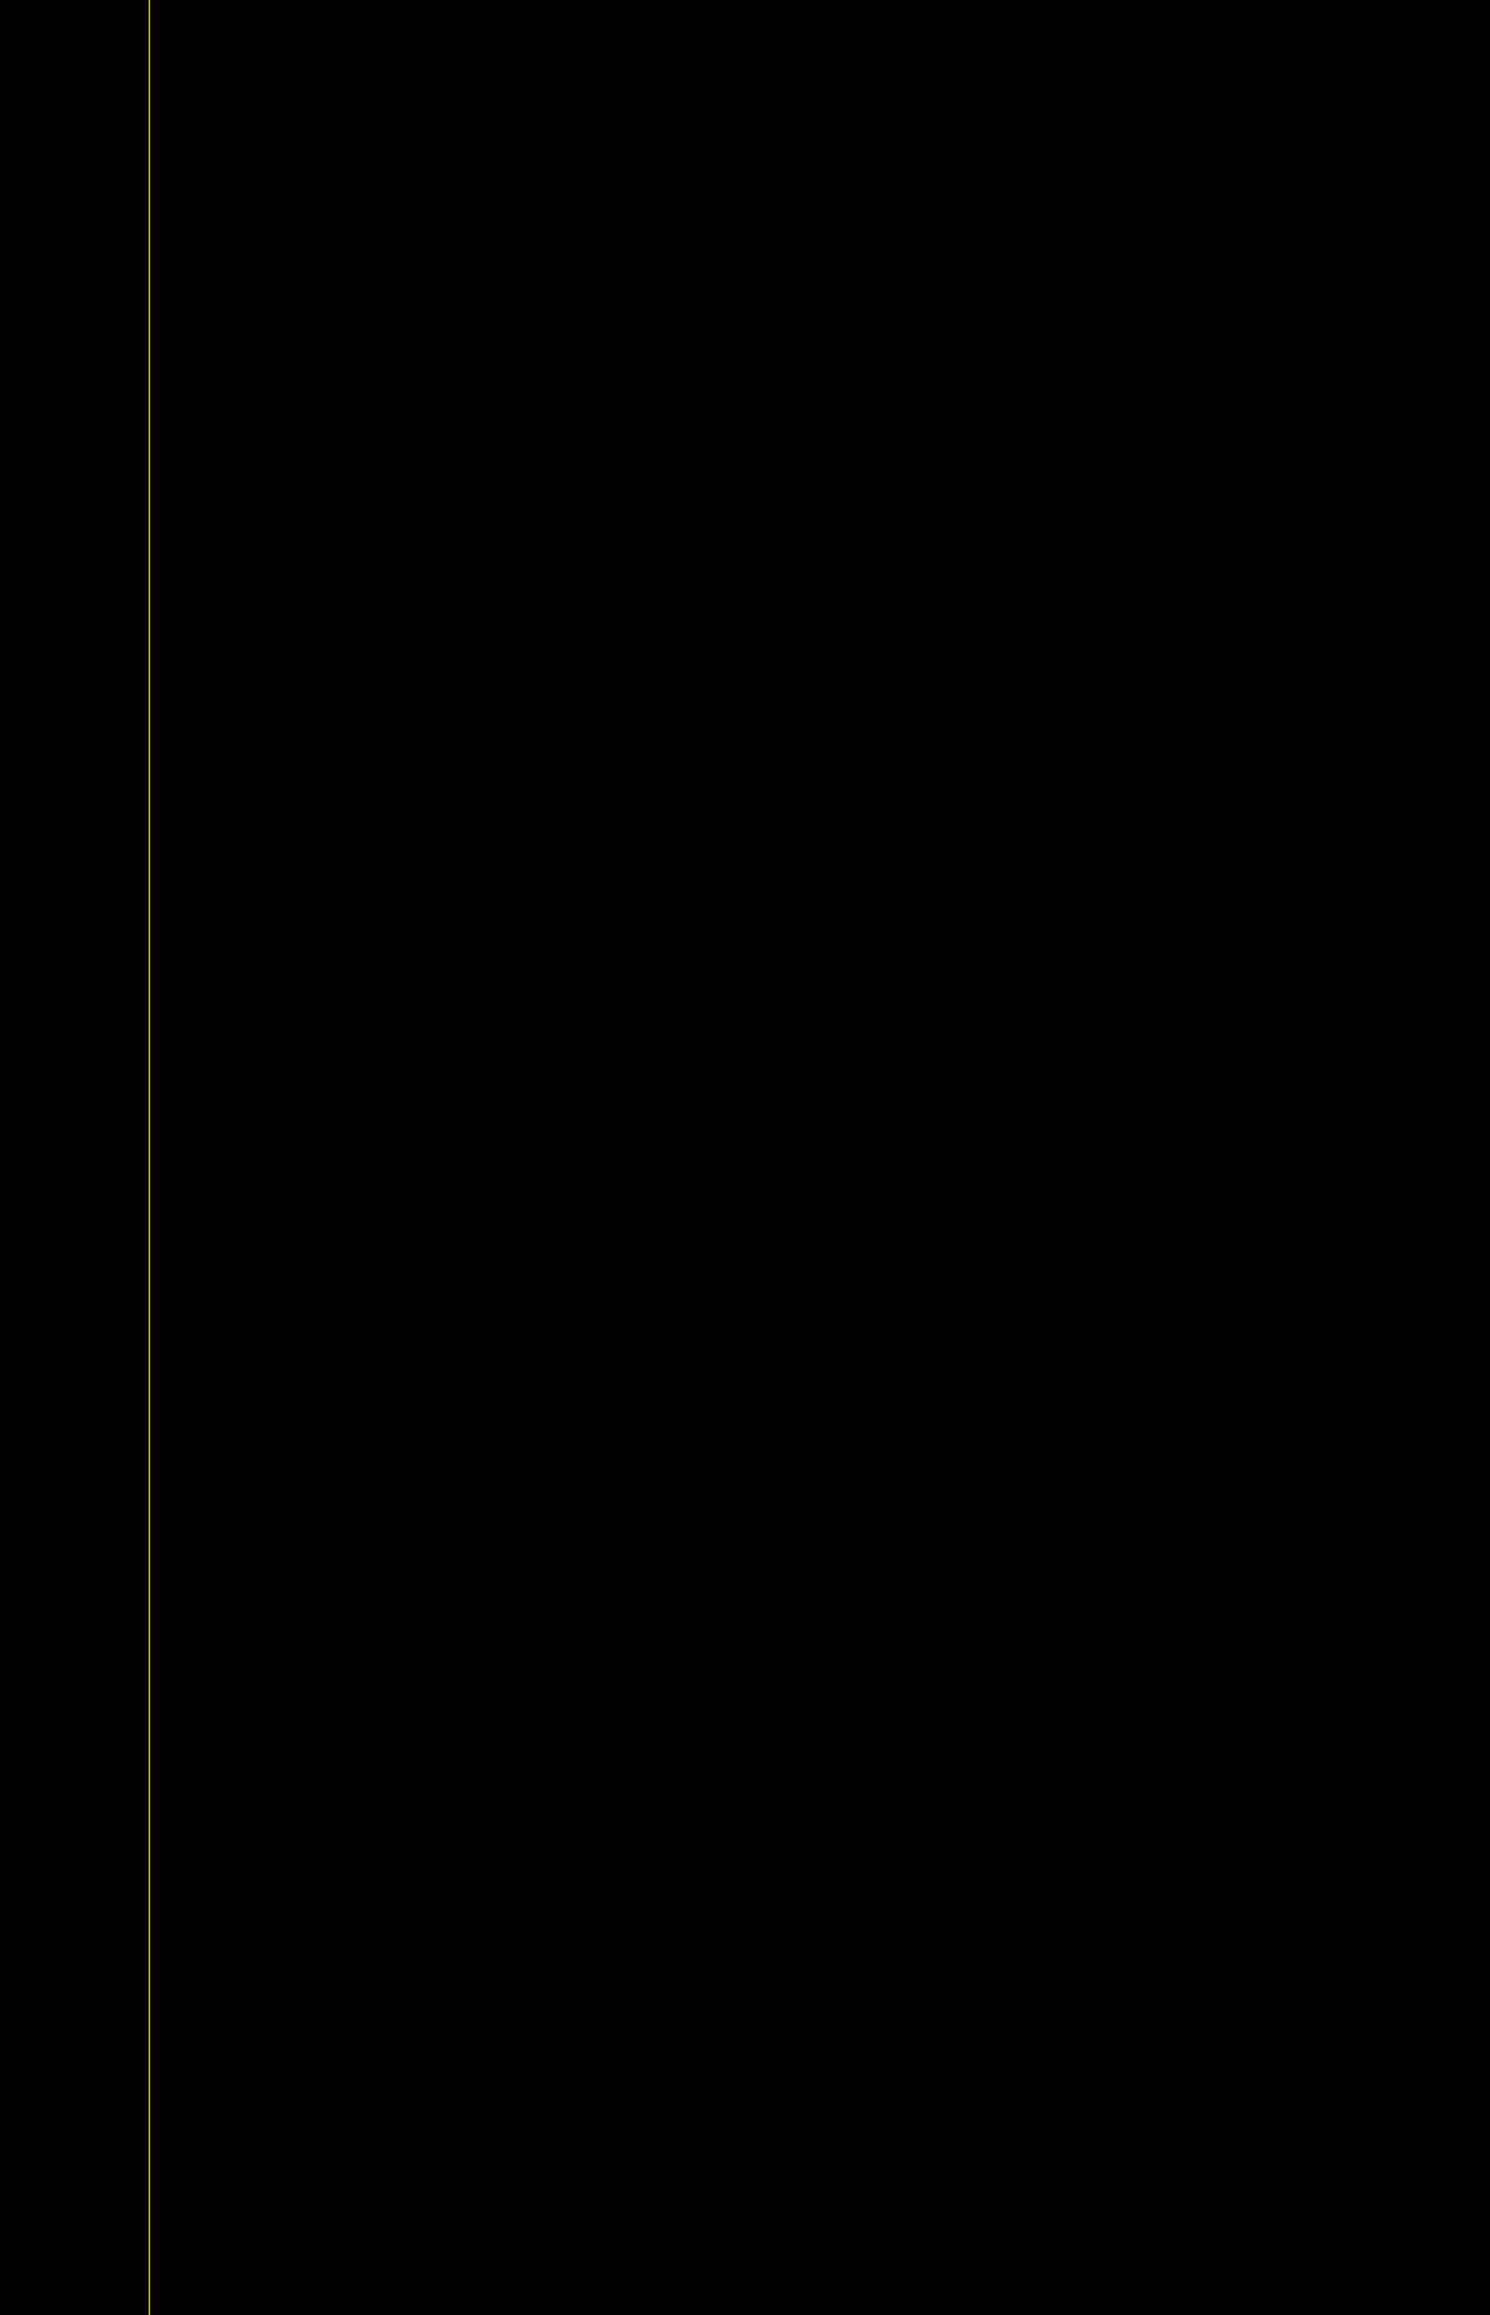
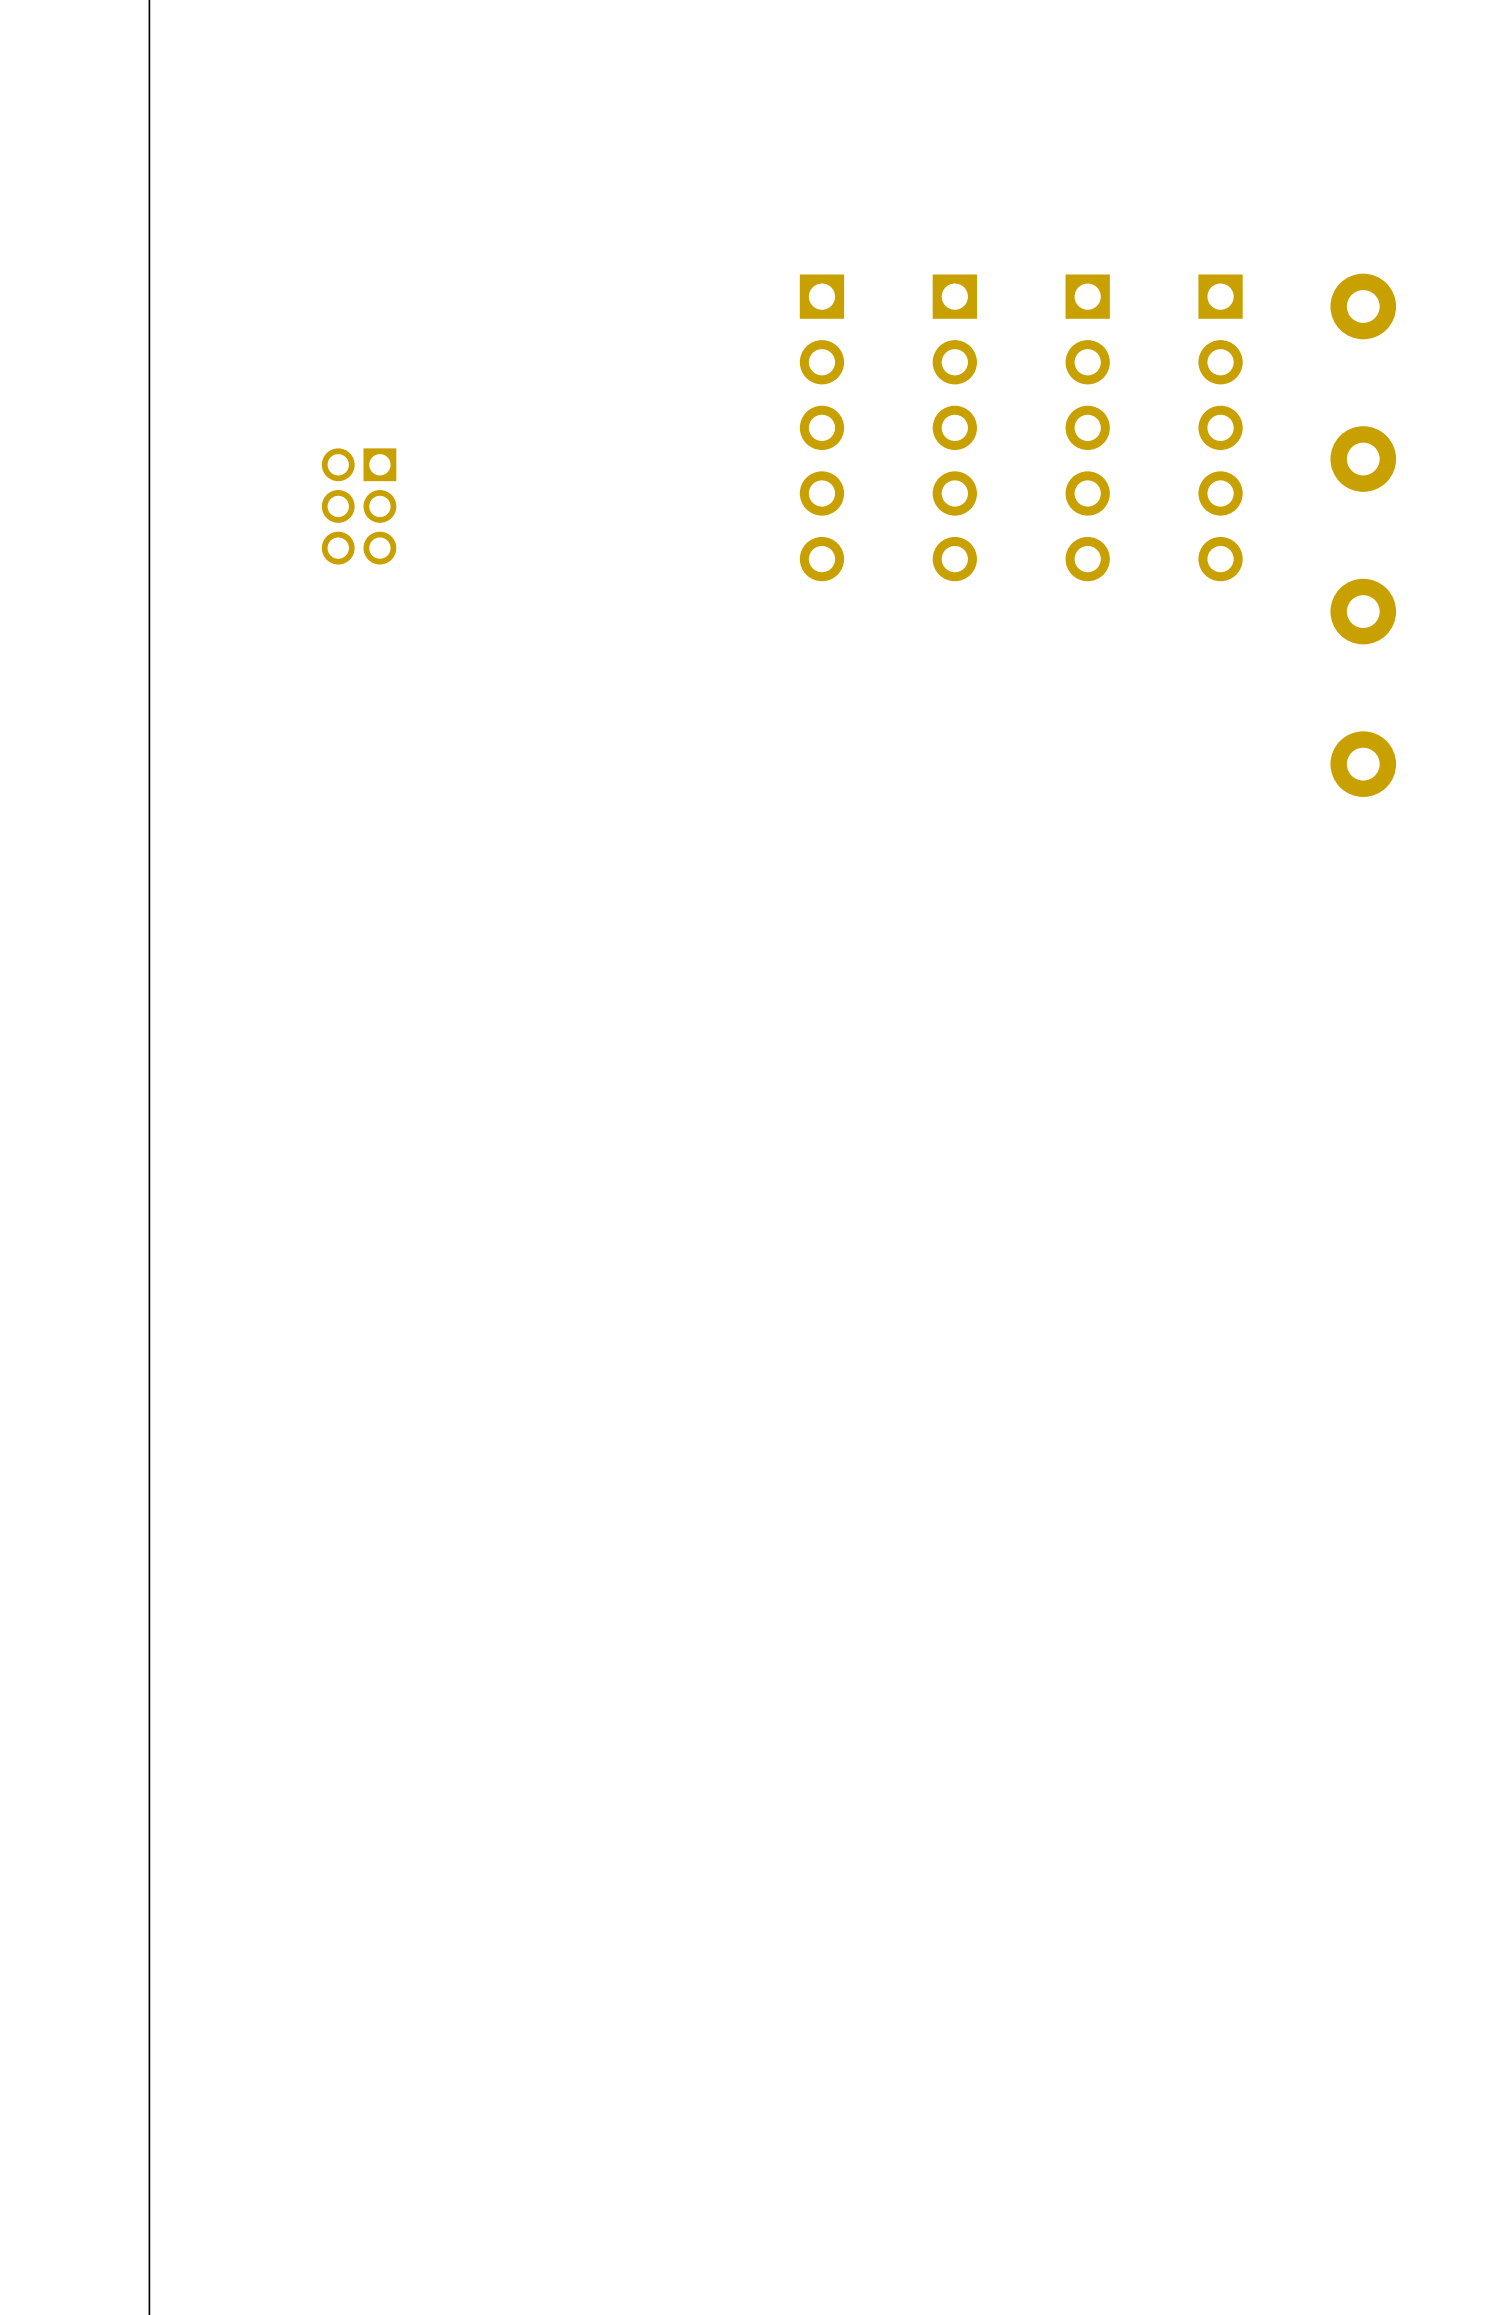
part: none -> (1363, 306)
part: none -> (821, 427)
part: none -> (954, 427)
part: none -> (1087, 427)
part: none -> (1220, 427)
part: none -> (1363, 459)
part: none -> (359, 506)
part: none -> (1363, 611)
part: none -> (1363, 764)

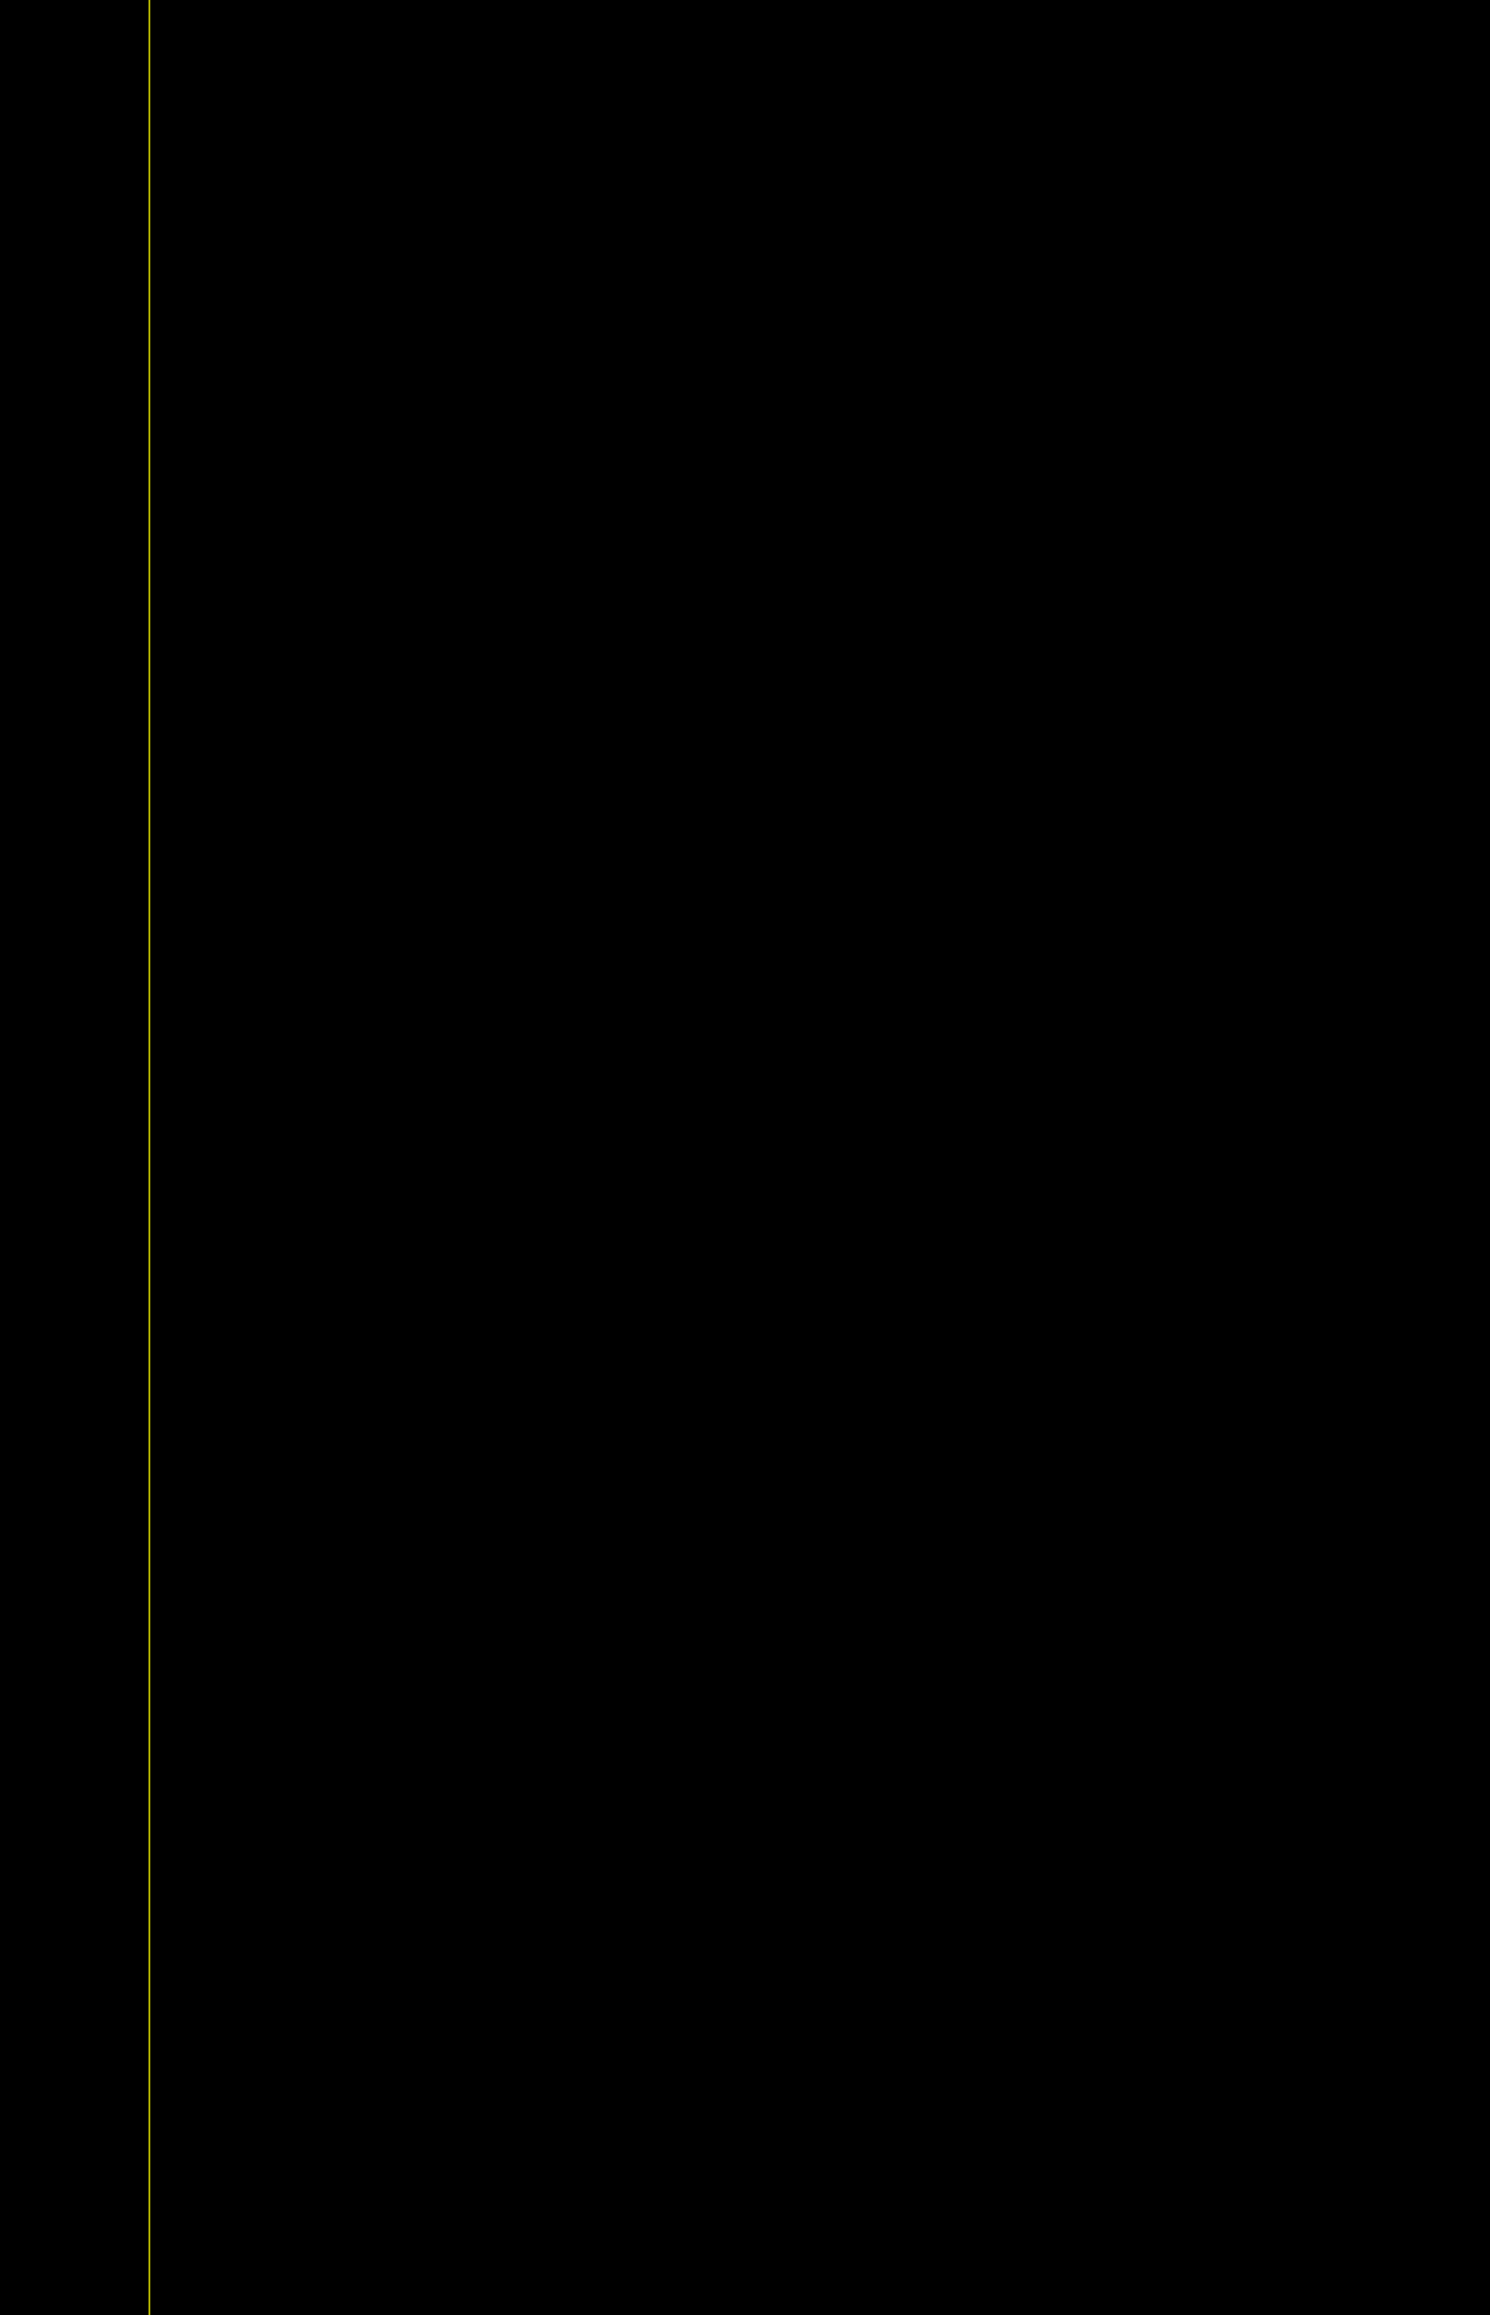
part: (1363, 306) -> none
part: (821, 427) -> none
part: (954, 427) -> none
part: (1087, 427) -> none
part: (1220, 427) -> none
part: (1363, 459) -> none
part: (359, 506) -> none
part: (1363, 611) -> none
part: (1363, 764) -> none

